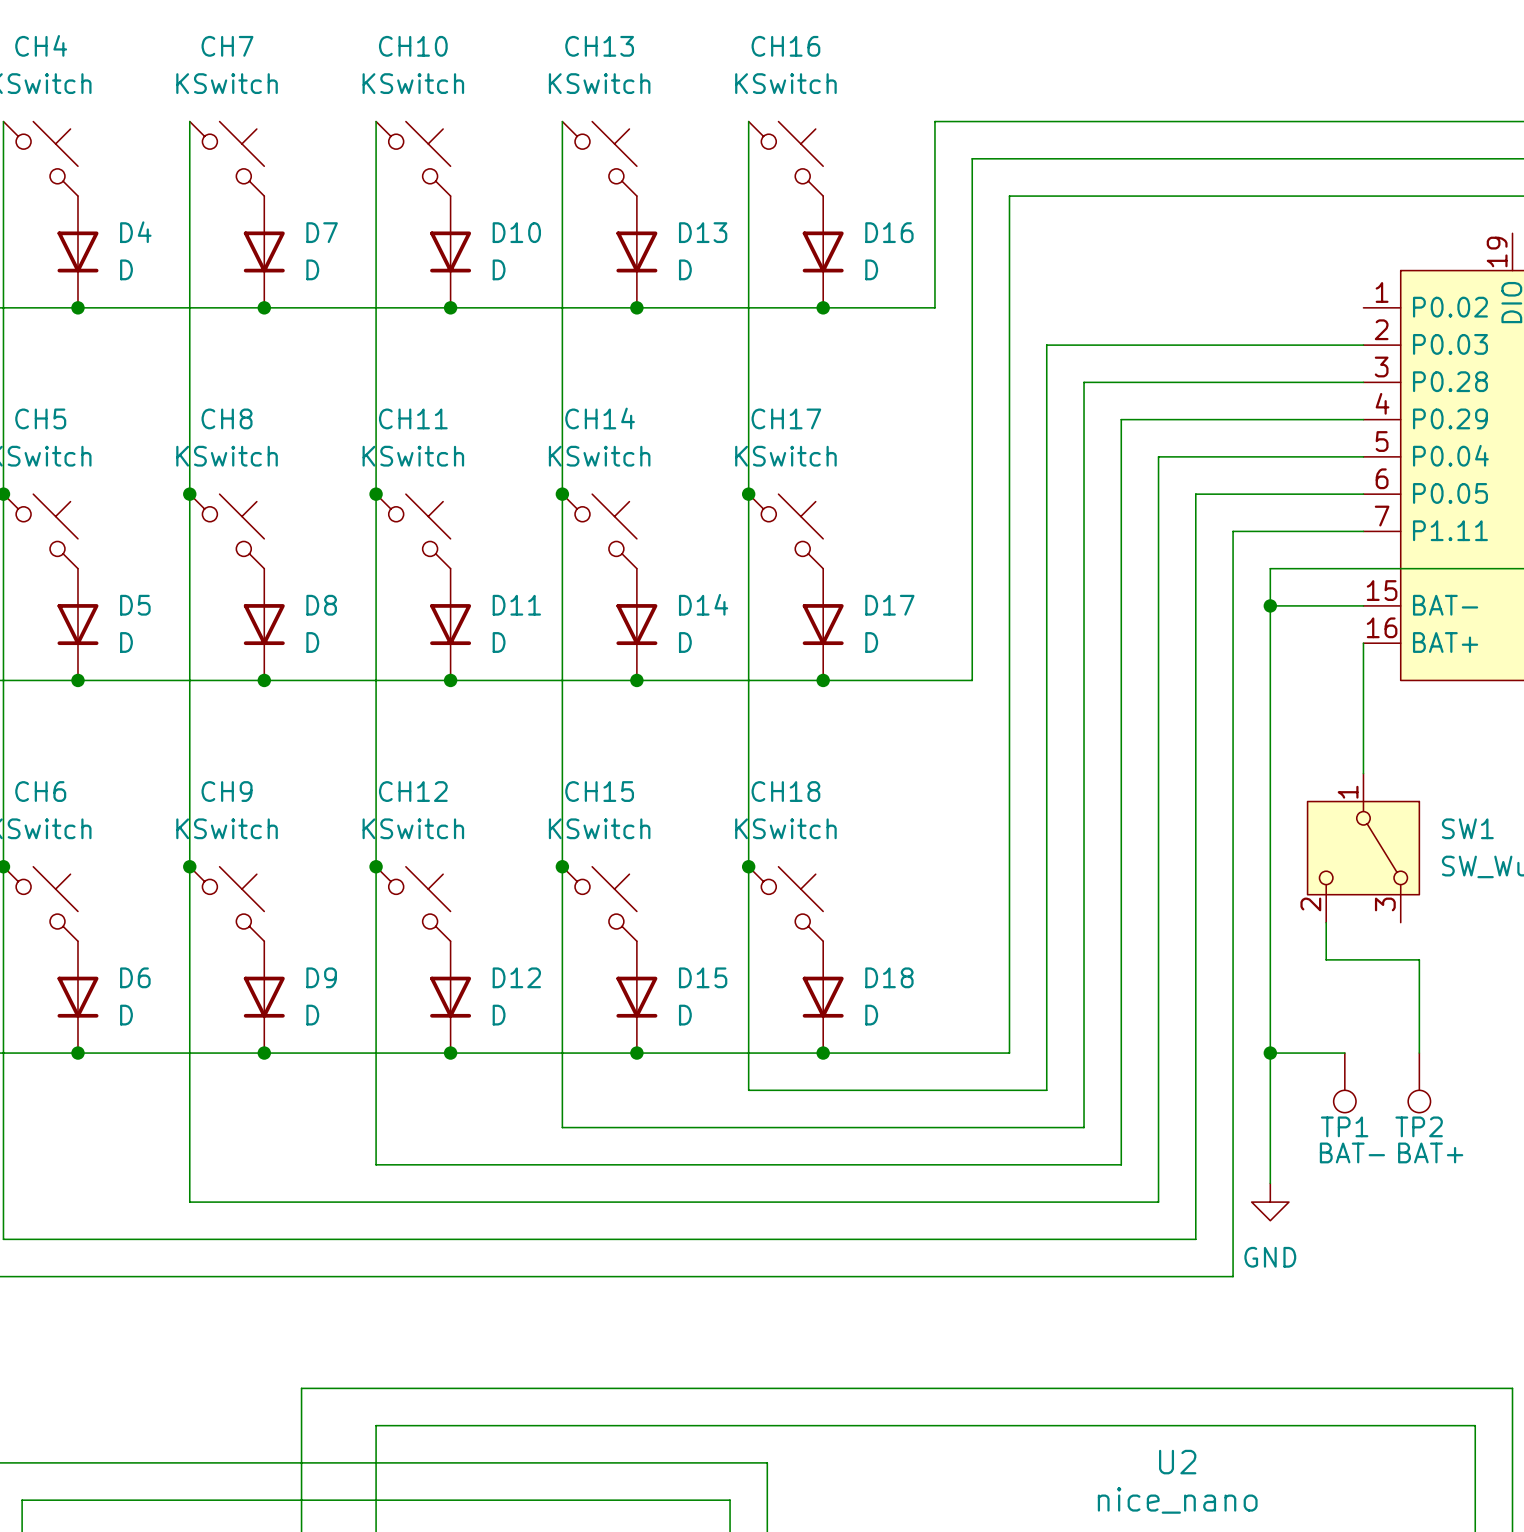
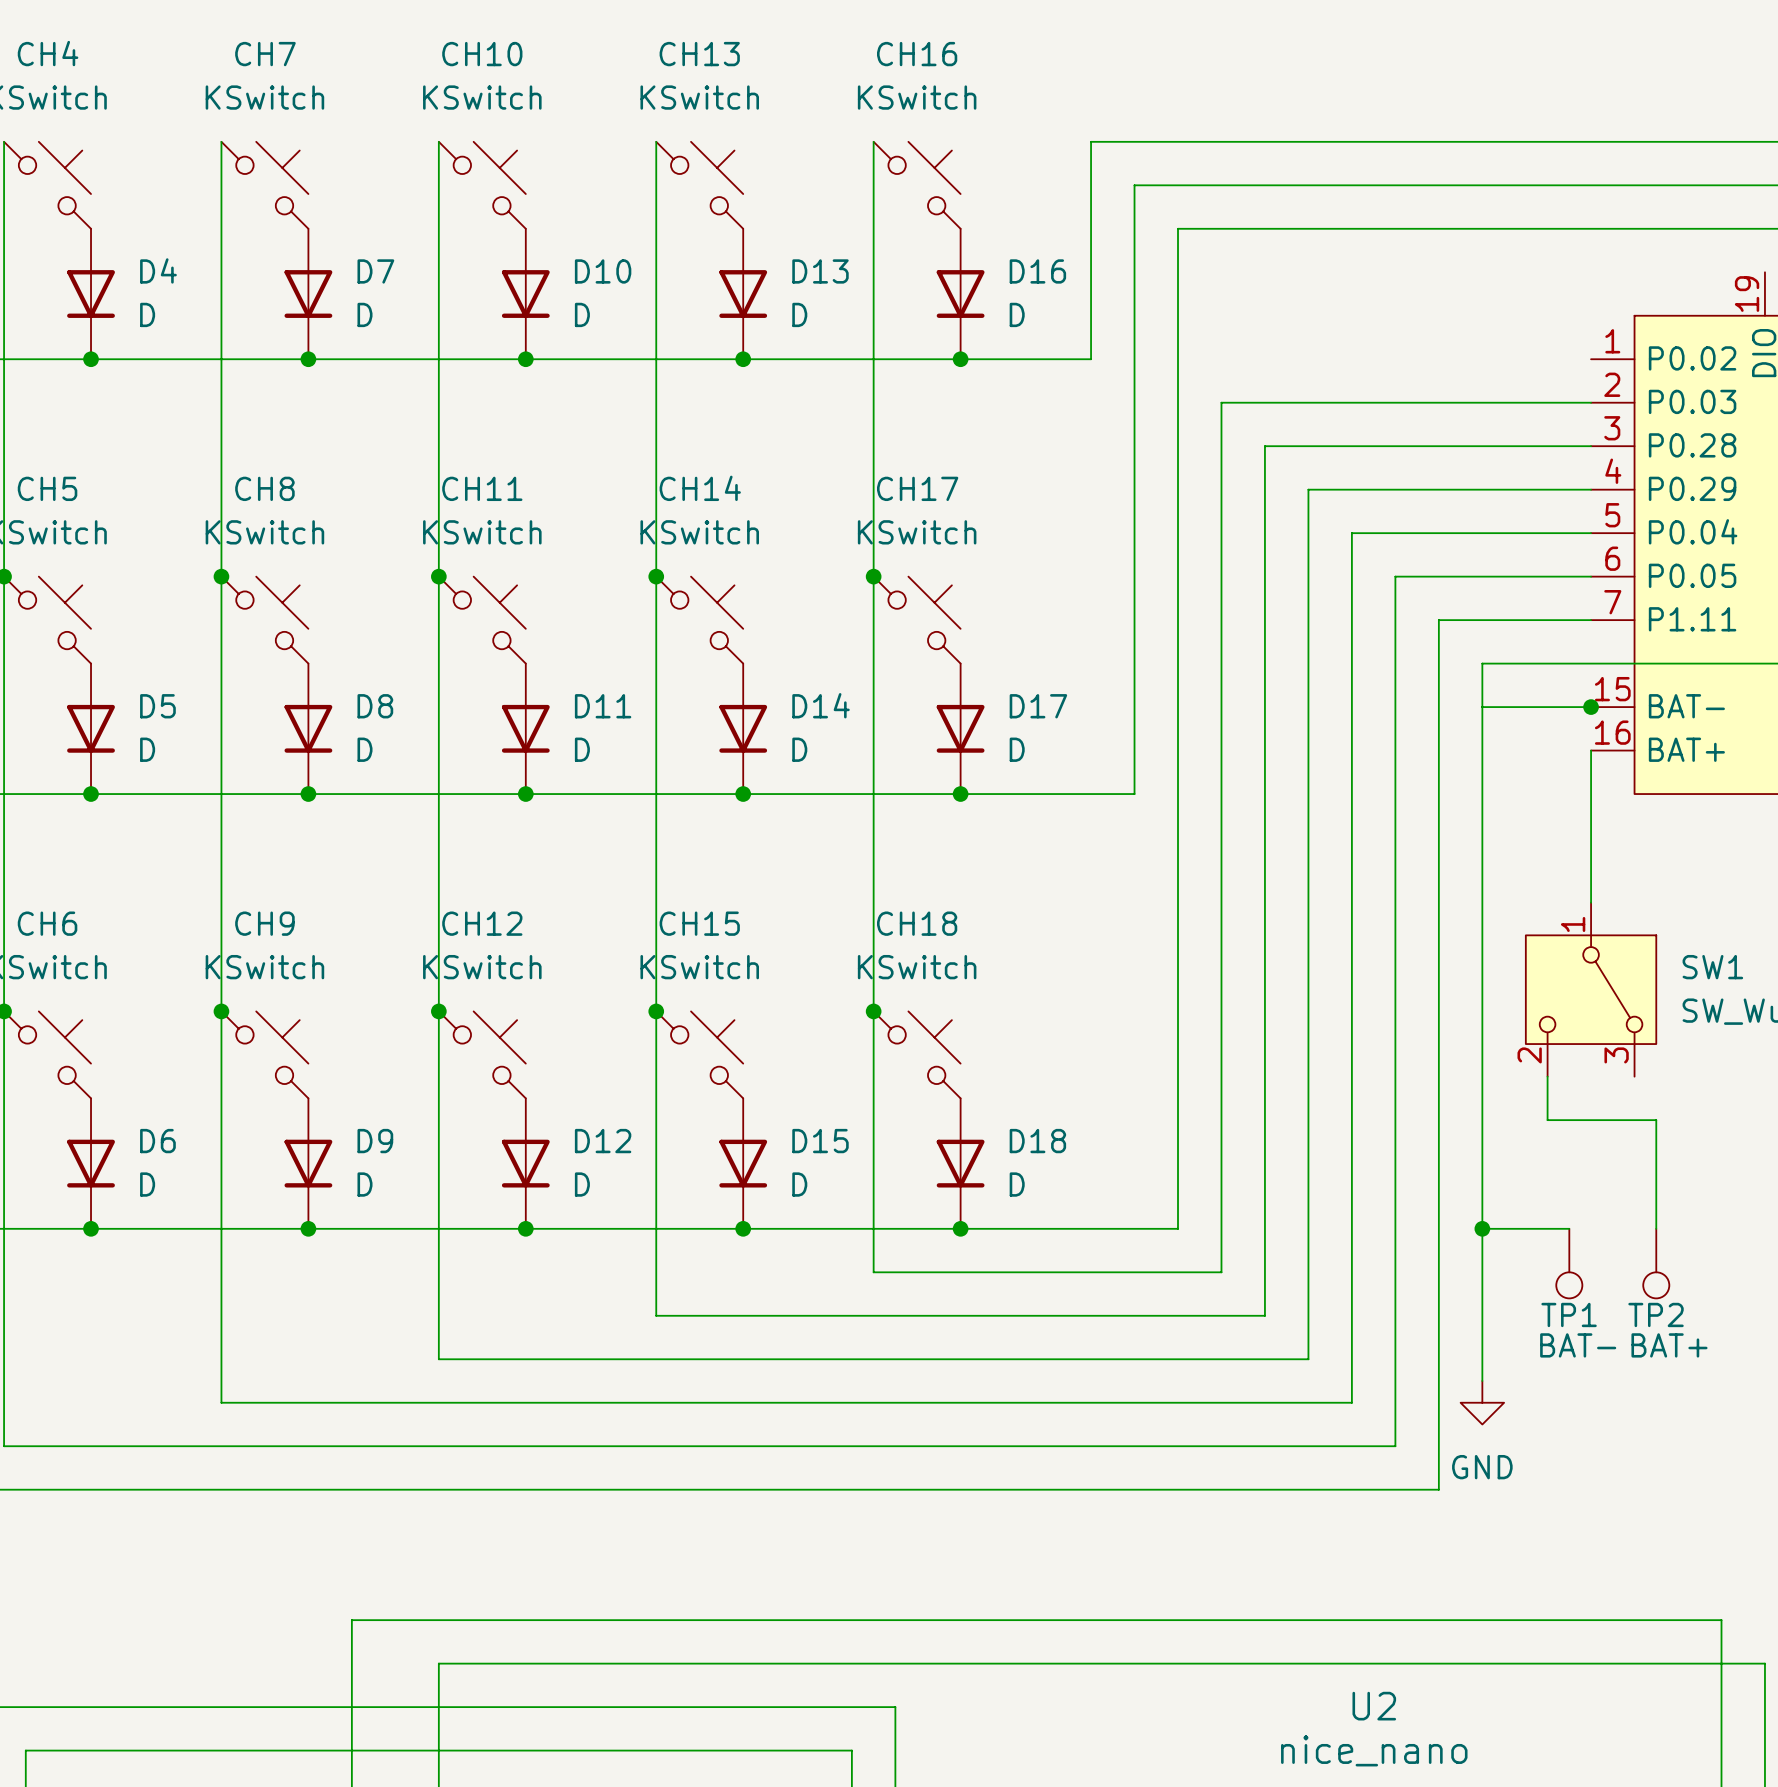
junction: (1270, 605) -> none
junction: none -> (1591, 707)
wire: (1475, 1388) (1512, 1388) (1512, 1425) -> (1721, 1620) (1721, 1663) (1764, 1663)

